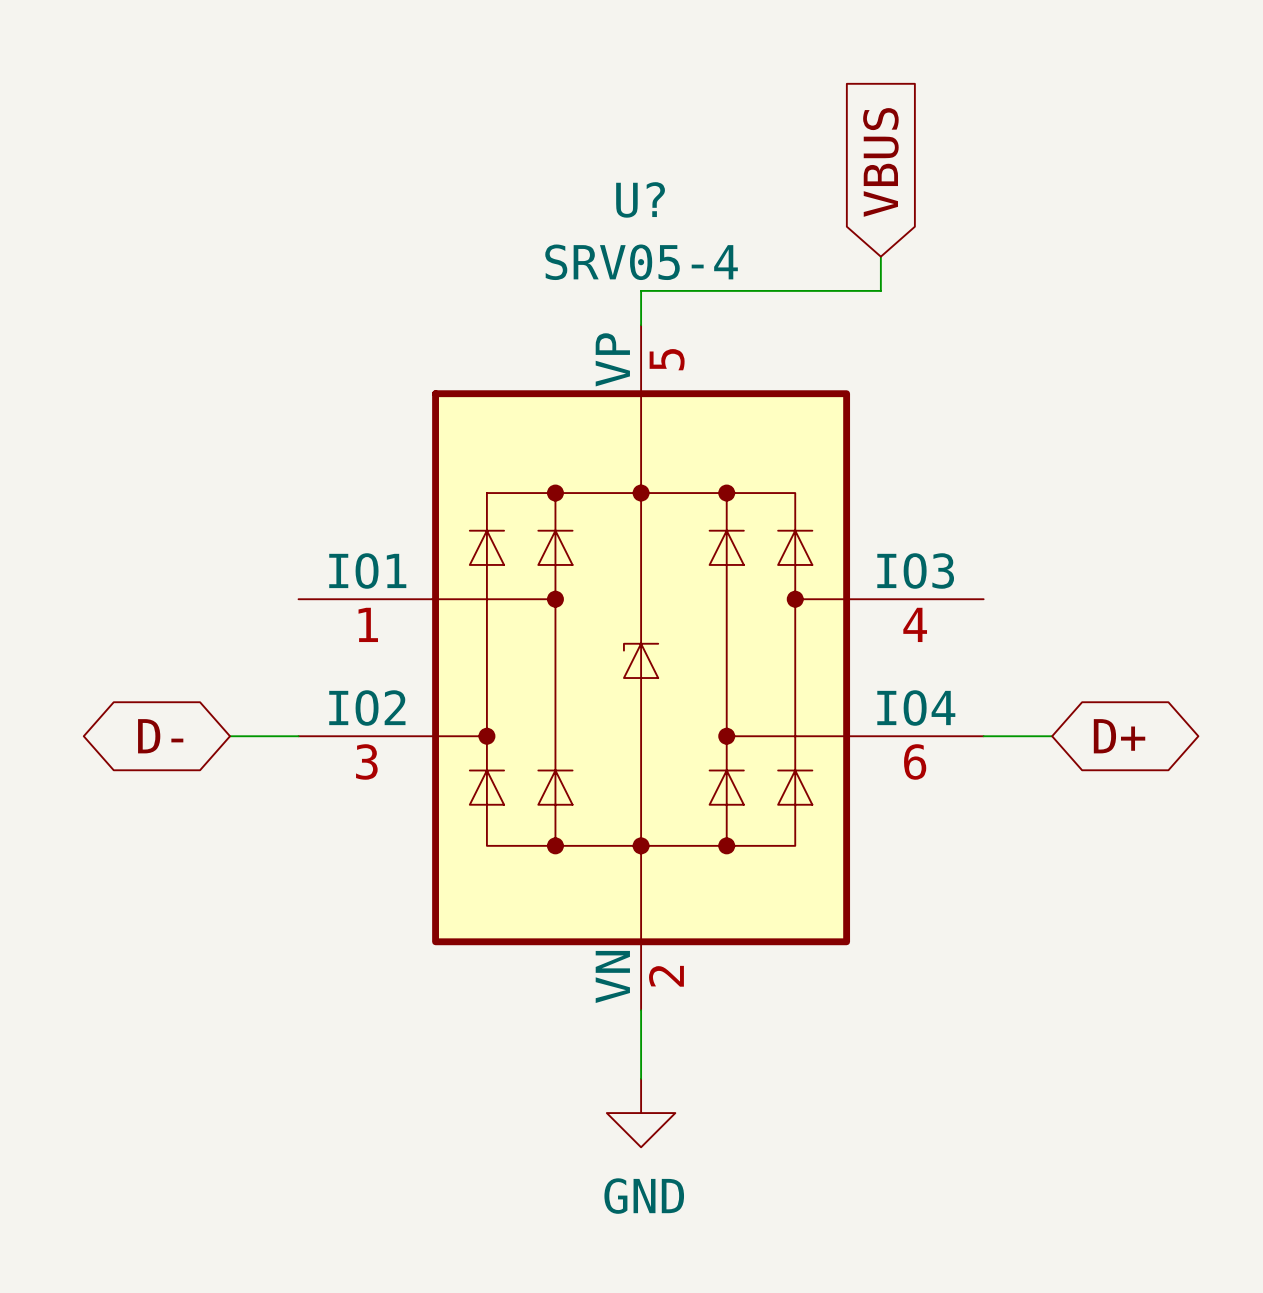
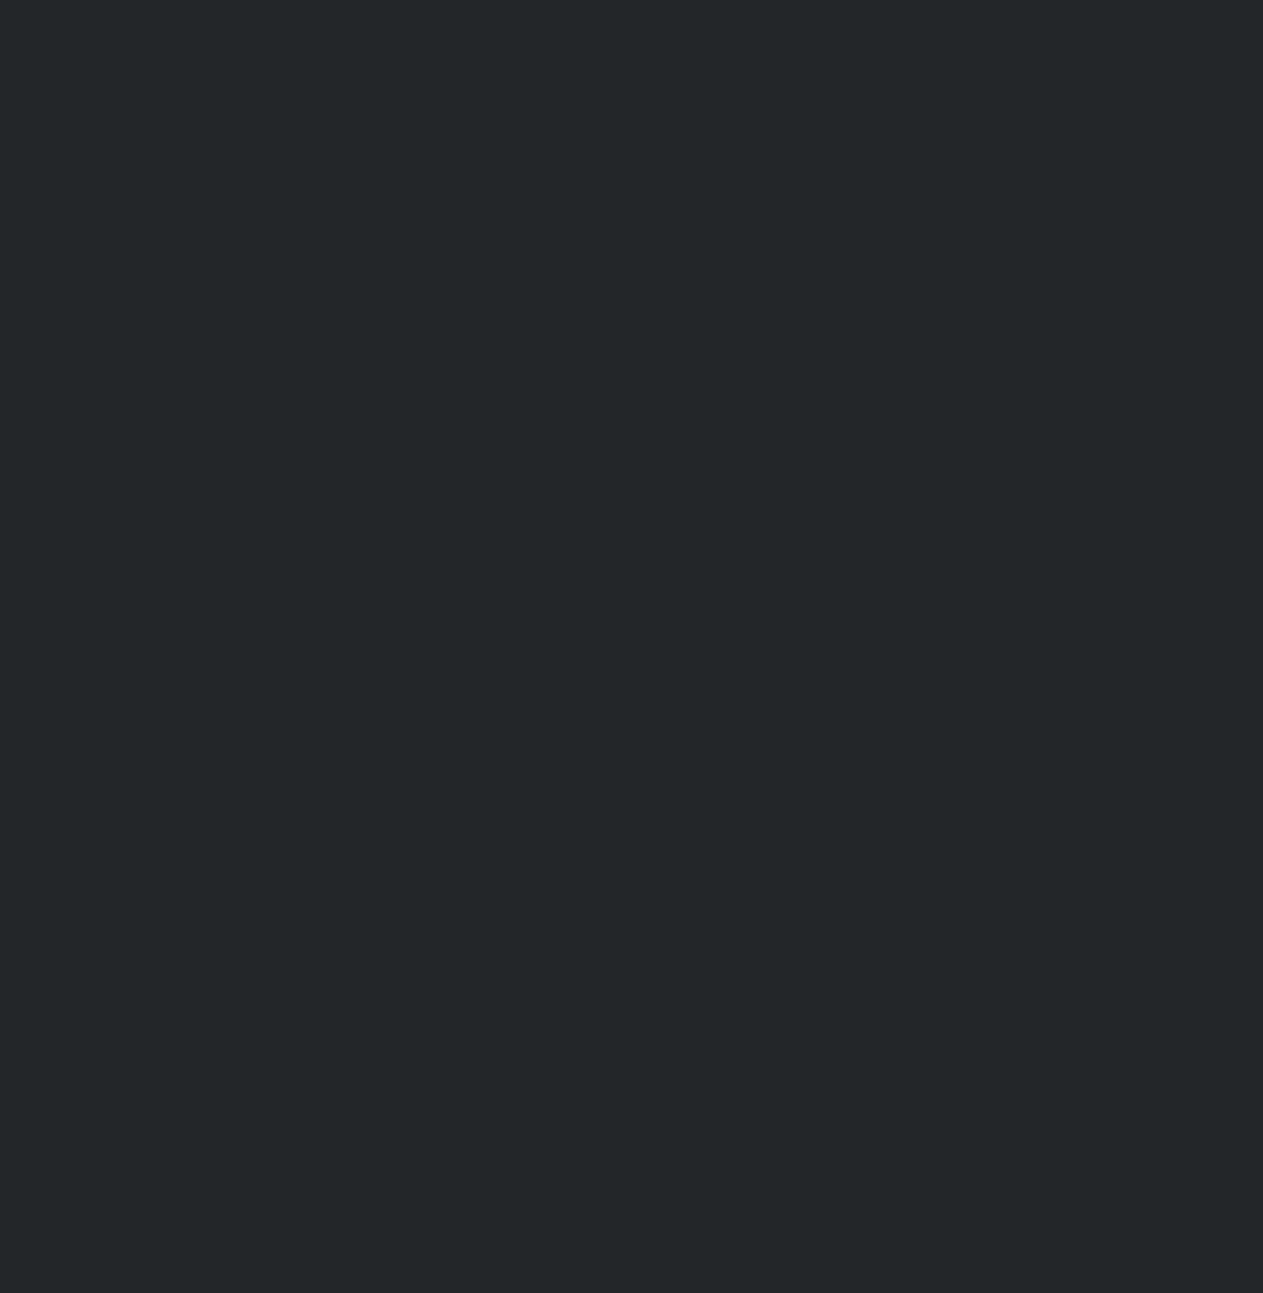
global label: VBUS (880, 162) -> none
wire: (880, 256) (880, 290) (641, 290) (641, 325) -> none
U?: SRV05-4 (641, 667) -> none
global label: D- (160, 736) -> none
wire: (230, 736) (298, 736) -> none
wire: (983, 736) (1052, 736) -> none
global label: D+ (1119, 736) -> none
wire: (641, 1010) (641, 1078) -> none
power symbol: GND (641, 1113) -> none

